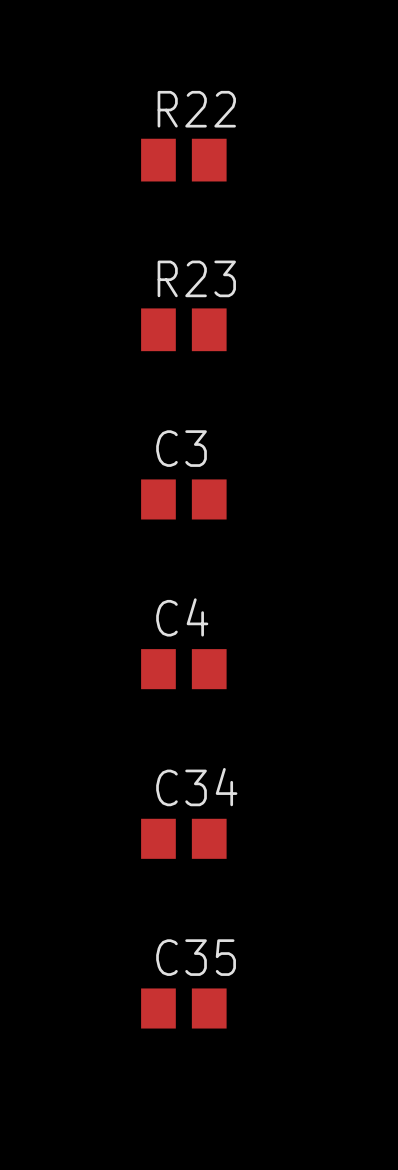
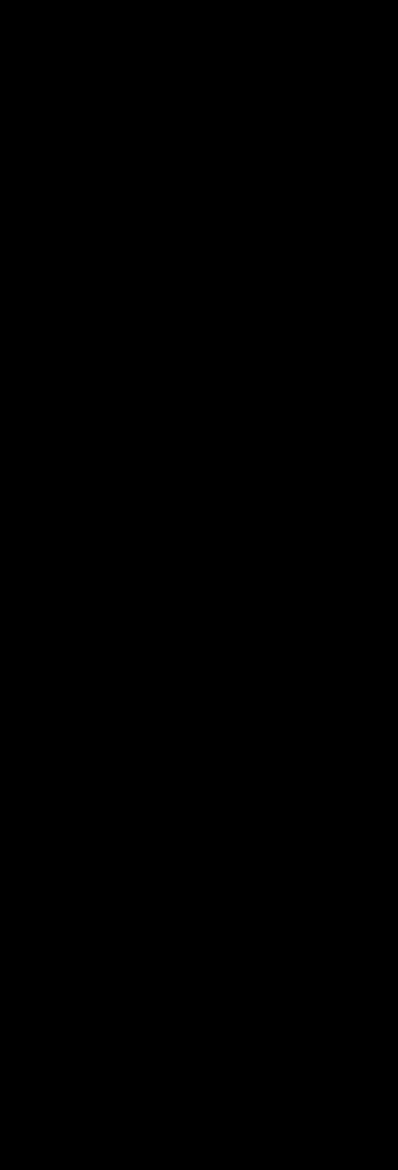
R22: (183, 160) -> none
R23: (183, 329) -> none
C3: (183, 499) -> none
C4: (183, 669) -> none
C34: (183, 838) -> none
C35: (183, 1008) -> none

